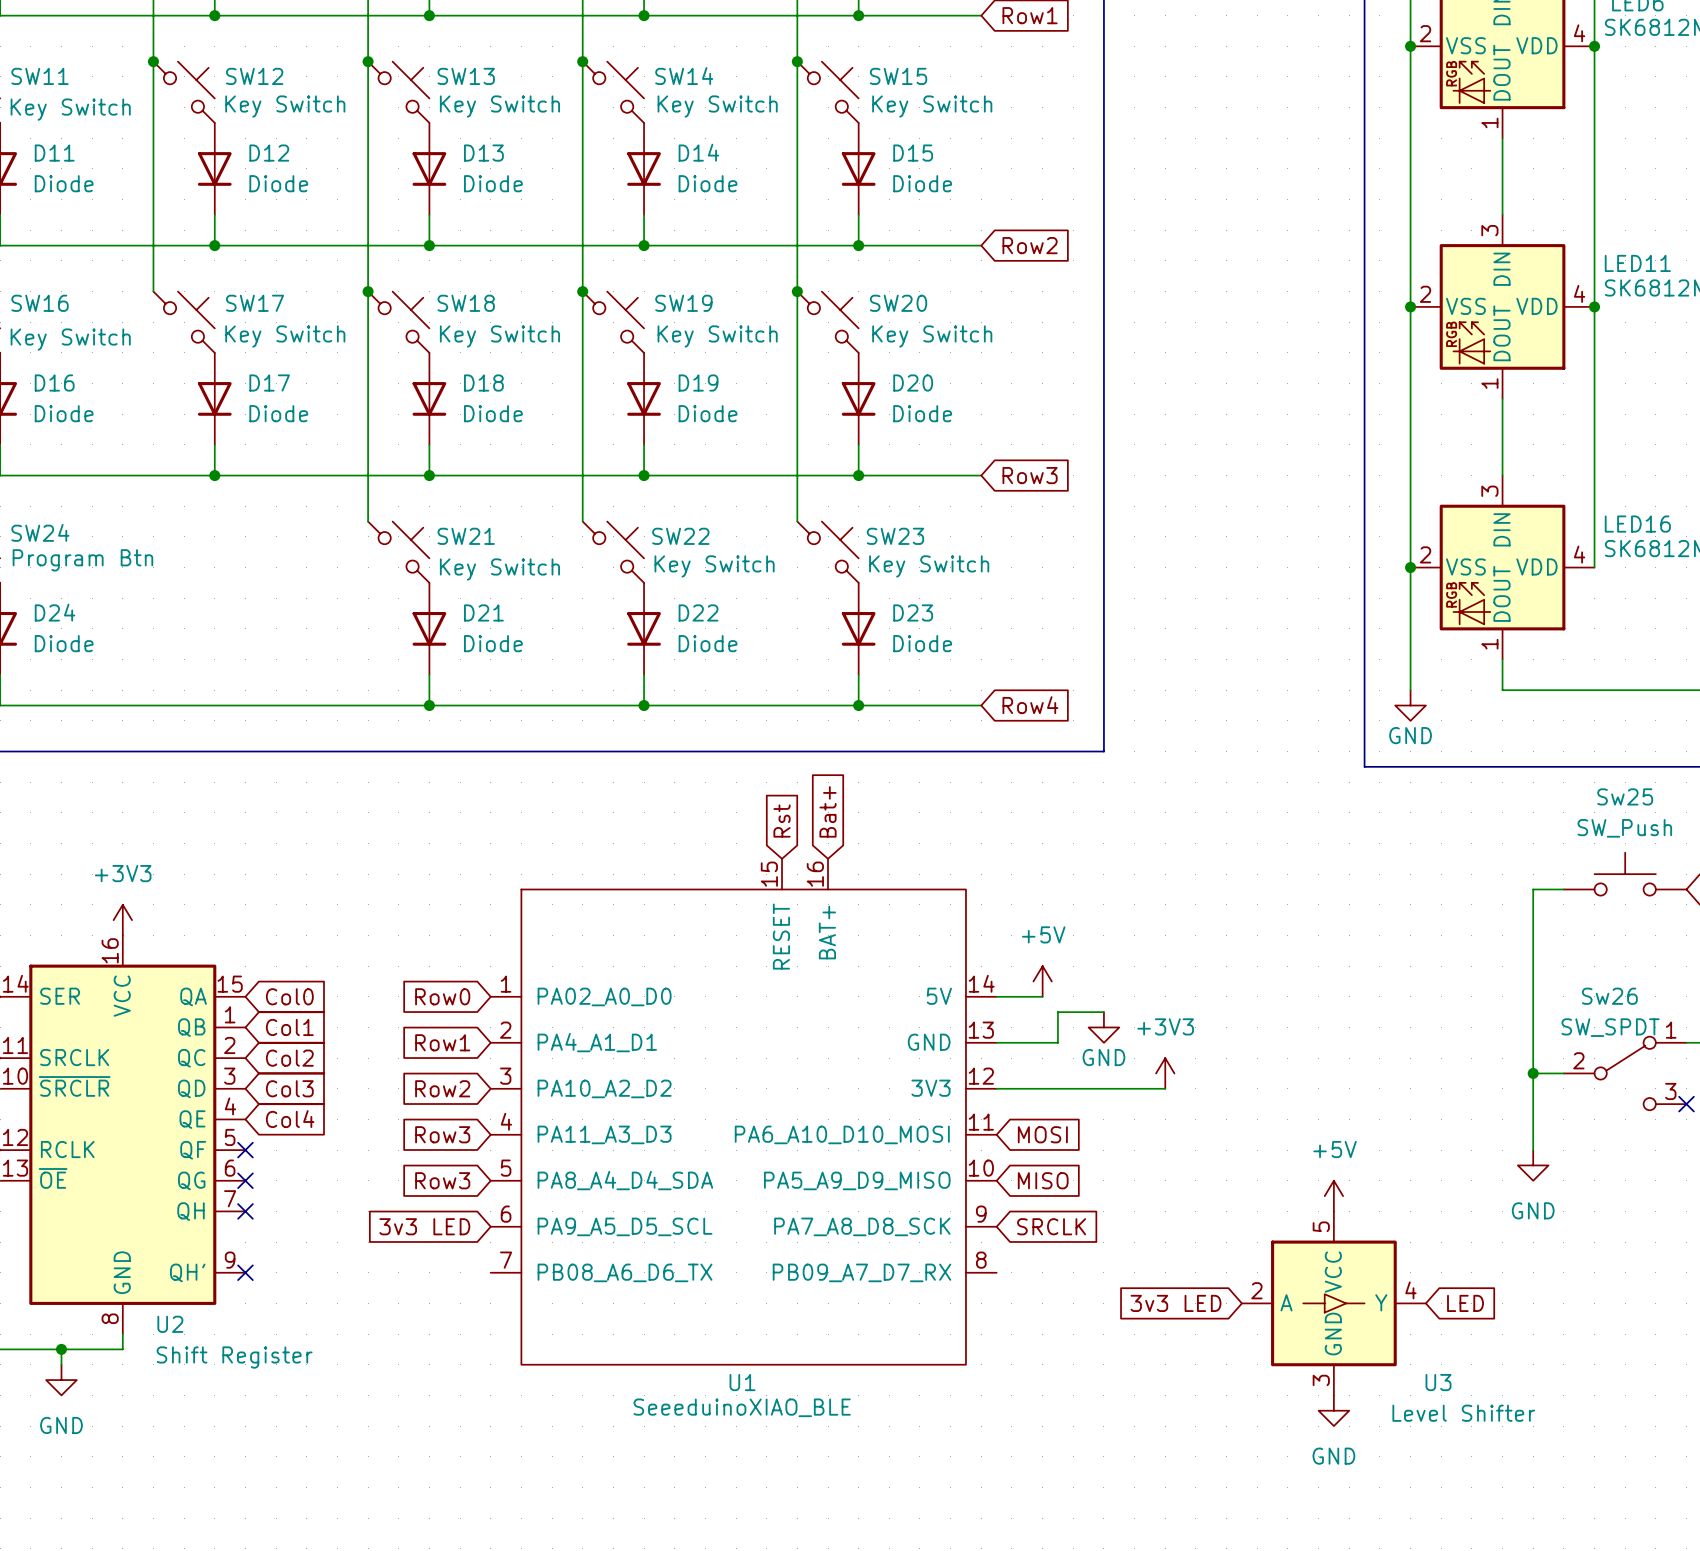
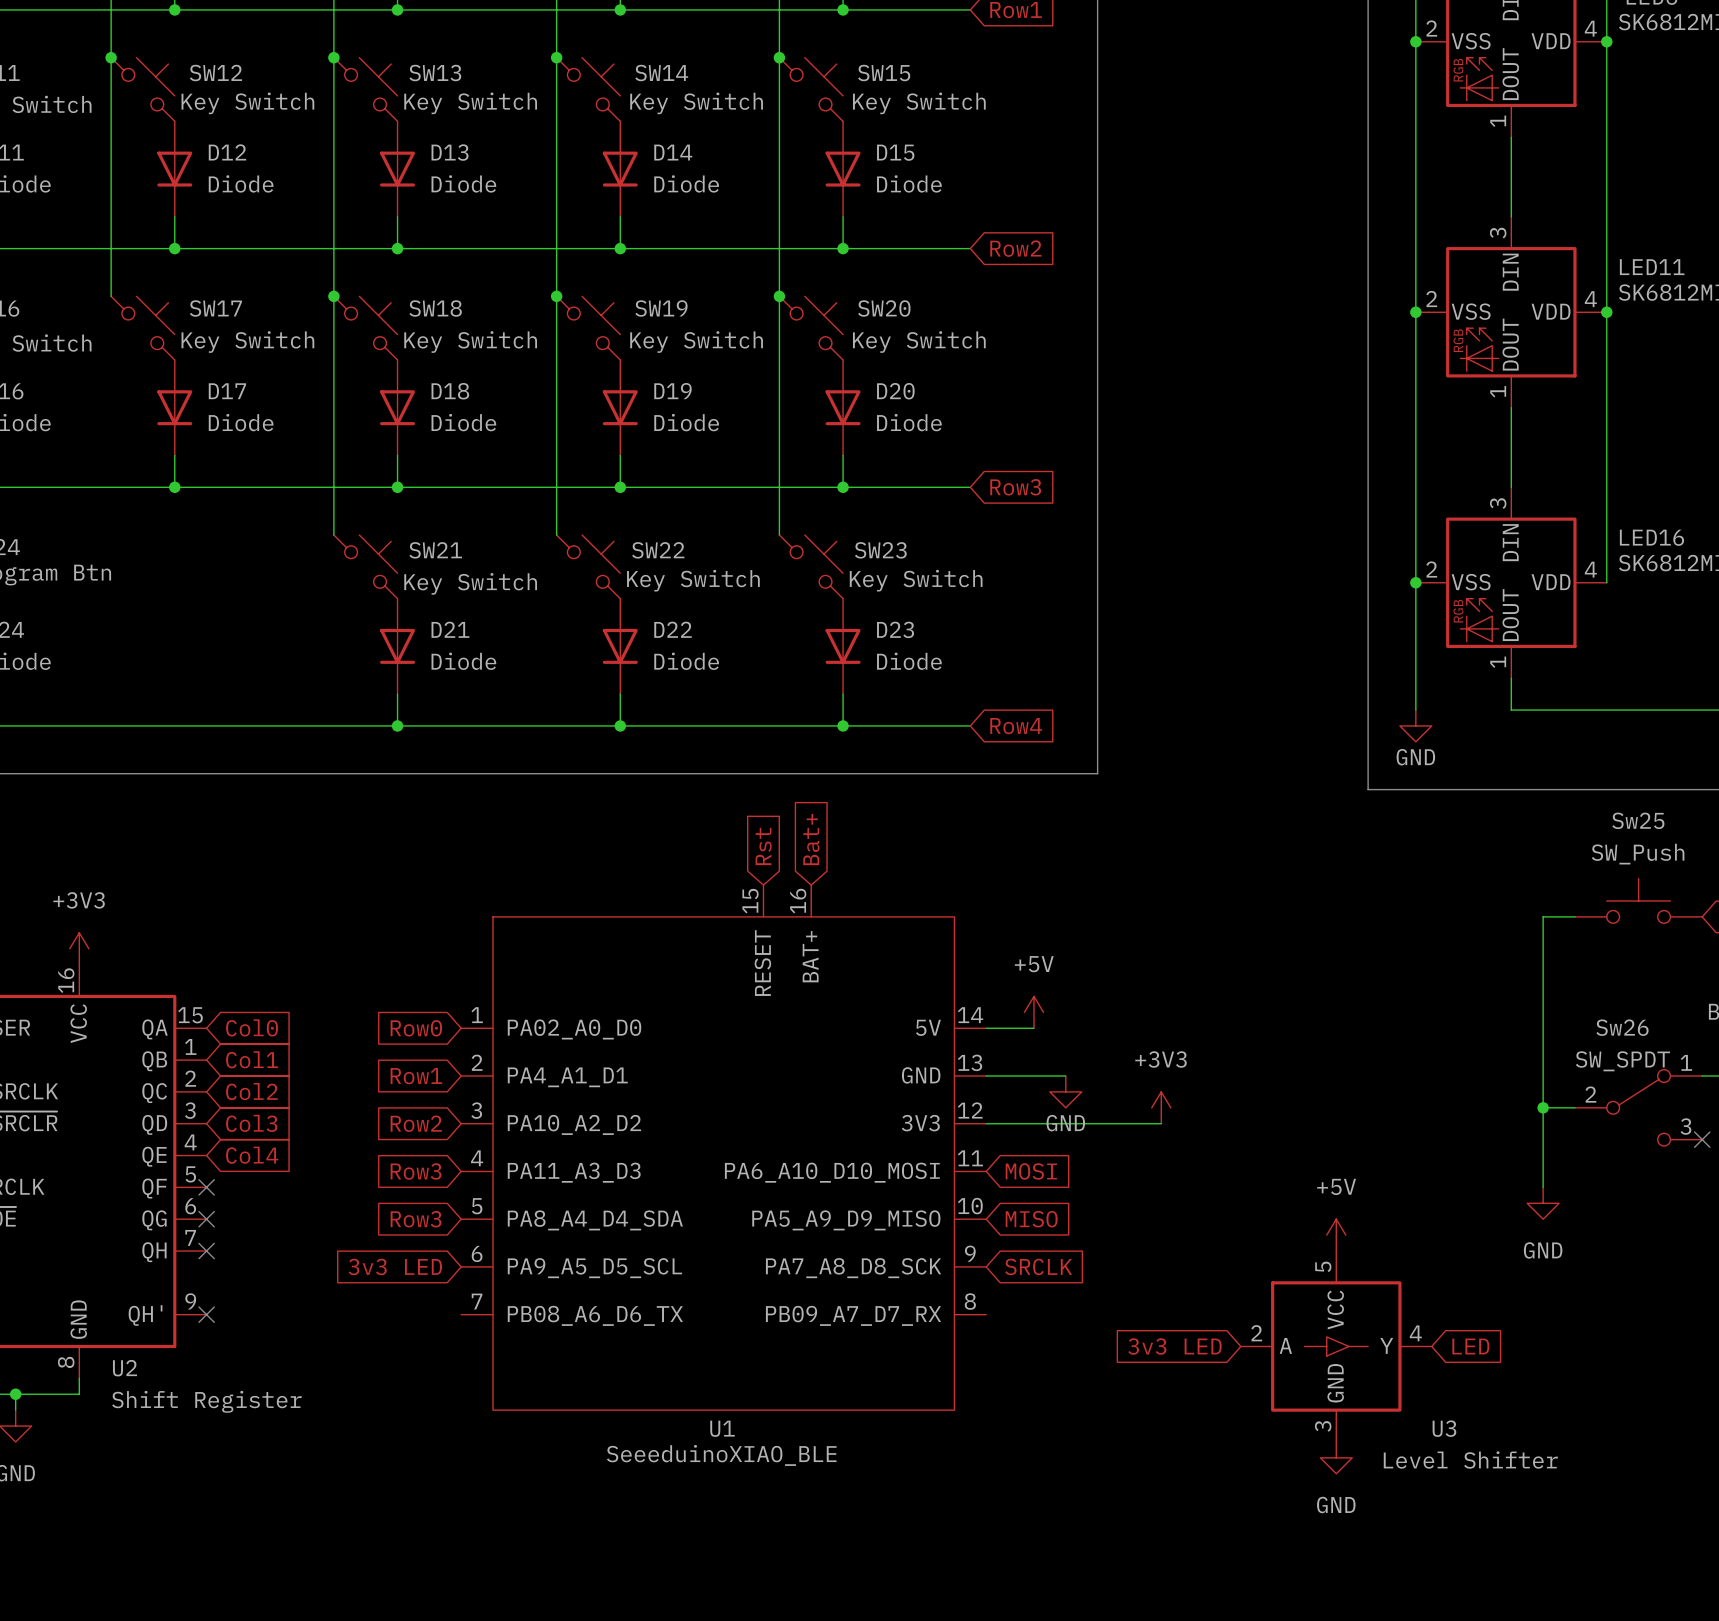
wire: (1103, 1012) (1057, 1012) (1057, 1042) -> (1065, 1076) (1049, 1076)
power symbol position: GND (1103, 1027) -> GND (1065, 1091)

